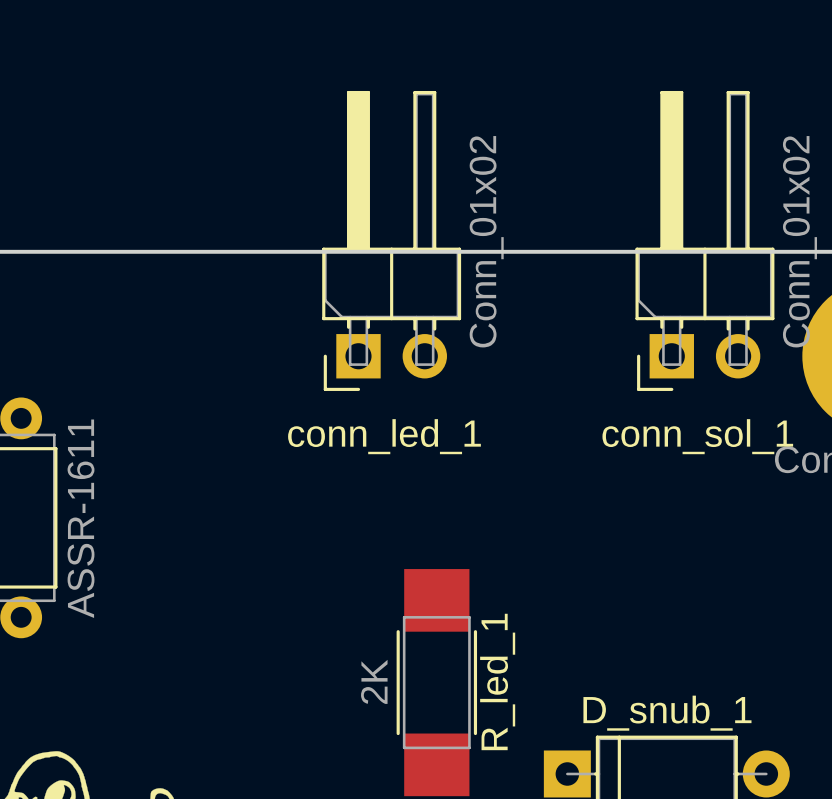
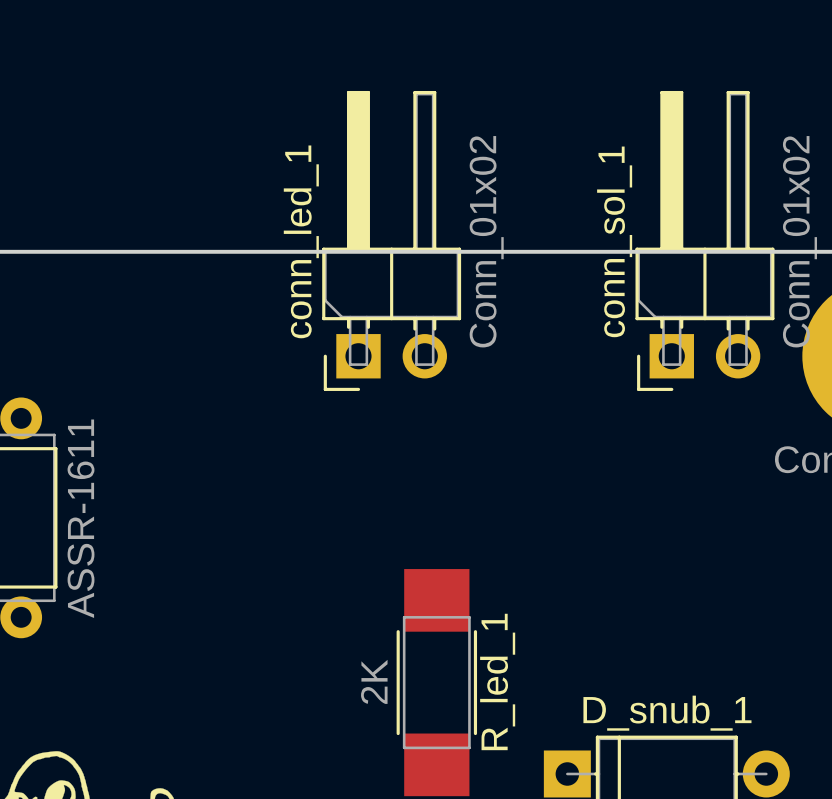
conn_led_1 name rotation: 0° (384, 436) -> 90° counterclockwise (301, 241)
conn_sol_1 name rotation: 0° (697, 436) -> 90° counterclockwise (614, 241)

